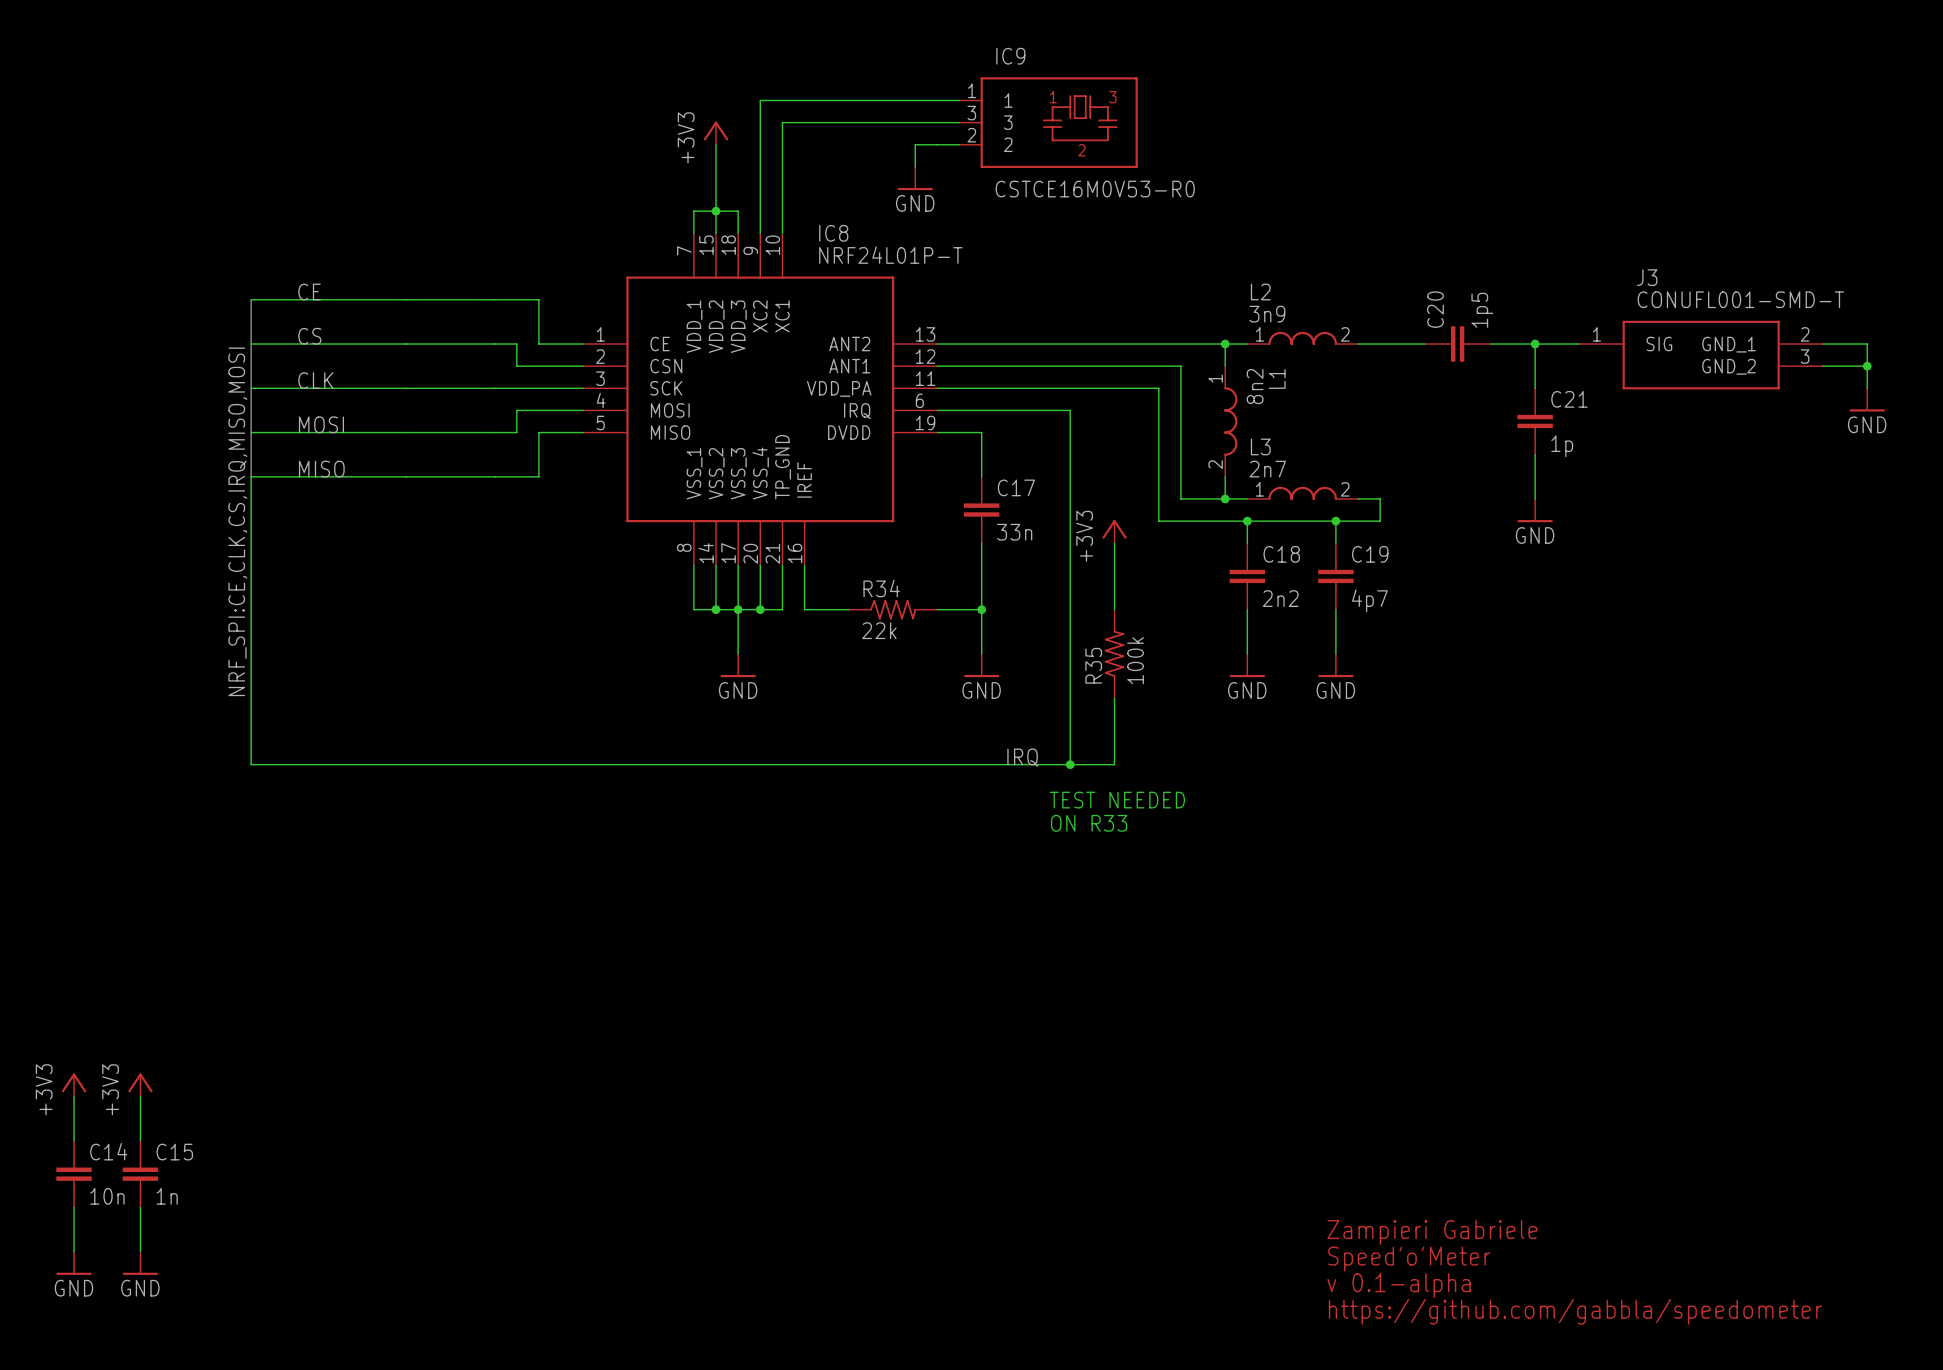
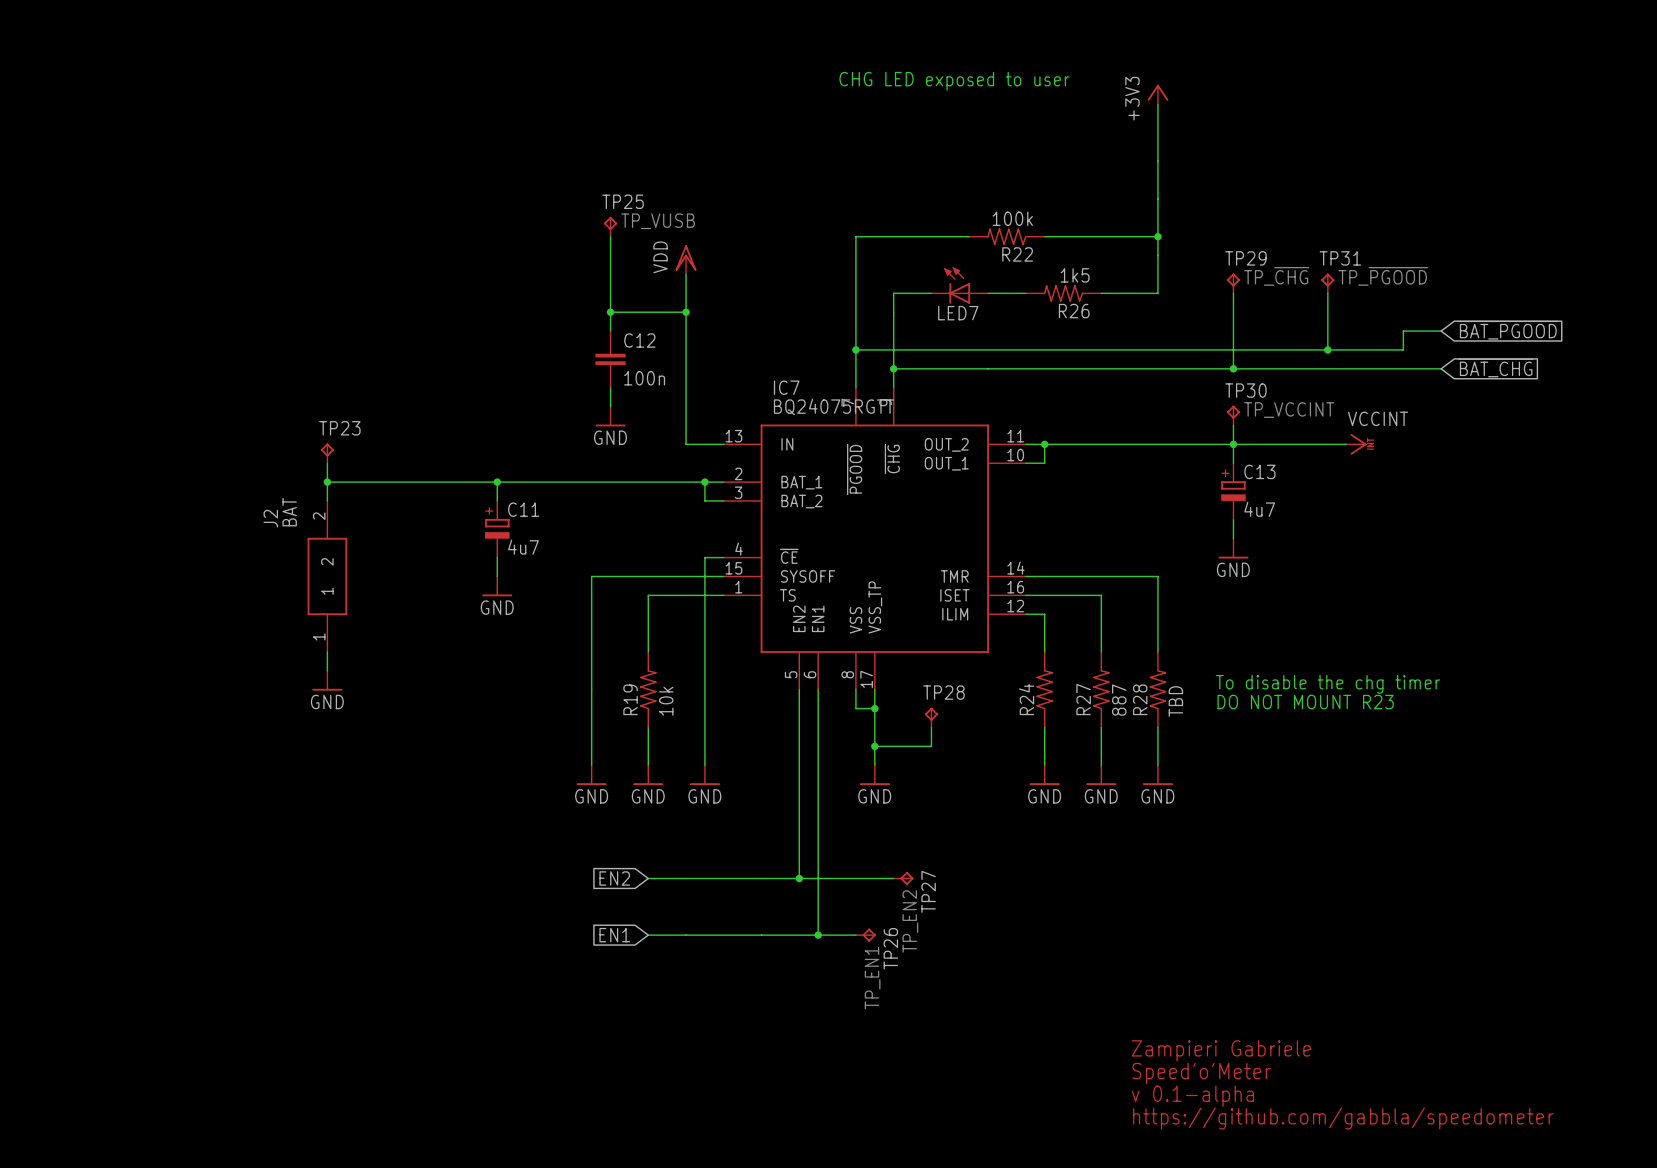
text: none -> CHG LED exposed to user (954, 81)
wire: (959, 100) (760, 100) (760, 233) -> none
power symbol: none -> +3V3 (1157, 94)
wire: (959, 122) (782, 122) (782, 233) -> none
IC9: CSTCE16M0V53-R0 (1048, 122) -> none
wire: none -> (1157, 104) (1157, 293) (1101, 293)
power symbol: +3V3 (716, 133) -> none
wire: (716, 144) (716, 233) -> none
wire: (959, 144) (915, 144) (915, 166) -> none
power symbol: GND (915, 178) -> none
junction: (716, 211) -> none
wire: (693, 233) (693, 211) (738, 211) (738, 233) -> none
TP25: none -> (610, 226)
wire: none -> (610, 236) (610, 331)
wire: none -> (969, 236) (855, 236) (855, 387)
R22: none -> 100k (1006, 236)
wire: none -> (1044, 236) (1157, 236)
junction: none -> (1157, 236)
label: CE (309, 291) -> none
bus: (251, 299) (251, 476) -> none
wire: (251, 299) (538, 299) (538, 344) (583, 344) -> none
power symbol: none -> VDD (686, 259)
wire: none -> (686, 274) (686, 444) (723, 444)
TP29: none -> (1233, 283)
TP31: none -> (1327, 283)
LED7: none -> (959, 285)
label: CS (309, 336) -> none
L2: 3n9 (1302, 338) -> none
wire: (251, 344) (516, 344) (516, 366) (583, 366) -> none
wire: (937, 344) (1048, 344) -> (893, 387) (893, 293)
wire: (1225, 344) (1225, 366) -> none
junction: (1225, 344) -> none
R26: none -> 1k5 (1063, 293)
wire: (1358, 344) (1424, 344) -> none
wire: none -> (1233, 293) (1233, 368)
C20: 1p5 (1457, 344) -> none
wire: (1490, 344) (1579, 344) -> none
wire: (1535, 344) (1535, 388) -> none
junction: (1535, 344) -> none
wire: none -> (1327, 293) (1327, 349)
wire: (1822, 344) (1867, 344) (1867, 388) -> none
J3: CONUFL001-SMD-T (1701, 355) -> none
wire: none -> (610, 312) (686, 312)
junction: none -> (610, 312)
junction: none -> (686, 312)
wire: (937, 366) (1180, 366) (1180, 498) (1247, 498) -> none
wire: (1822, 366) (1867, 366) -> none
junction: (1867, 366) -> none
label: CLK (315, 380) -> none
global label: none -> ~{BAT_PGOOD} (1508, 330)
wire: (251, 388) (583, 388) -> none
wire: (937, 388) (1158, 388) (1158, 521) (1203, 521) -> none
IC8: NRF24L01P-T (760, 399) -> none
power symbol: GND (1867, 399) -> none
wire: (583, 410) (516, 410) (516, 432) (251, 432) -> none
wire: (937, 410) (1003, 410) -> none
junction: none -> (855, 349)
wire: (1070, 410) (1070, 764) -> (912, 349) (1403, 349) (1403, 331) (1441, 331)
junction: none -> (1327, 349)
C12: none -> 100n (610, 359)
L1: 8n2 (1230, 421) -> none
C21: 1p (1535, 421) -> none
label: MOSI (321, 424) -> none
global label: none -> ~{BAT_CHG} (1495, 367)
wire: (583, 432) (538, 432) (538, 476) (251, 476) (251, 764) (1114, 764) (1114, 698) -> none
wire: (937, 432) (981, 432) (981, 476) -> none
wire: none -> (893, 368) (1441, 368)
junction: none -> (893, 368)
junction: none -> (1233, 368)
wire: none -> (610, 387) (610, 406)
wire: (1535, 454) (1535, 498) -> (1233, 425) (1233, 463)
label: MISO (321, 469) -> none
wire: (1225, 476) (1225, 498) -> none
TP30: none -> (1233, 415)
power symbol: none -> GND (610, 416)
L3: 2n7 (1302, 493) -> none
junction: (1225, 498) -> none
wire: (1358, 498) (1380, 498) (1380, 521) -> (1346, 444) (1176, 444)
C17: 33n (981, 510) -> none
power symbol: GND (1535, 510) -> none
label: NRF_SPI:CE,CLK,CS,IRQ,MISO,MOSI (237, 521) -> none
wire: none -> (1044, 444) (1044, 463) (1025, 463)
junction: none -> (1044, 444)
wire: (1247, 521) (1247, 543) -> none
junction: (1247, 521) -> none
wire: (1335, 521) (1335, 543) -> (1233, 519) (1233, 538)
junction: (1335, 521) -> none
junction: none -> (1233, 444)
power symbol: none -> VCCINT (1356, 444)
TP23: none -> (327, 453)
power symbol: +3V3 (1114, 531) -> none
wire: none -> (327, 463) (327, 500)
wire: (981, 543) (981, 653) -> none
wire: (1114, 543) (1114, 609) -> none
wire: none -> (327, 482) (723, 482)
junction: none -> (327, 482)
wire: none -> (497, 482) (497, 500)
junction: none -> (497, 482)
wire: (693, 565) (693, 609) (782, 609) (782, 565) -> none
wire: (716, 565) (716, 609) -> none
wire: (738, 565) (738, 653) -> none
wire: (760, 565) (760, 609) -> none
wire: (804, 565) (804, 609) (848, 609) -> none
wire: none -> (704, 482) (704, 500) (723, 500)
junction: none -> (704, 482)
C18: 2n2 (1247, 576) -> none
C19: 4p7 (1335, 576) -> none
C13: none -> 4u7 (1233, 491)
junction: (716, 609) -> none
junction: (738, 609) -> none
junction: (760, 609) -> none
R34: 22k (893, 609) -> none
wire: (937, 609) (981, 609) -> none
junction: (981, 609) -> none
wire: (1247, 609) (1247, 653) -> none
wire: (1335, 609) (1335, 653) -> none
C11: none -> 4u7 (497, 529)
IC7: none -> BQ24075RGTT (874, 538)
power symbol: none -> GND (1233, 548)
wire: none -> (497, 557) (497, 576)
wire: none -> (723, 557) (704, 557) (704, 765)
R35: 100k (1114, 653) -> none
power symbol: GND (738, 665) -> none
power symbol: GND (981, 665) -> none
power symbol: GND (1247, 665) -> none
power symbol: GND (1335, 665) -> none
J2: none -> BAT (327, 576)
wire: none -> (723, 576) (591, 576) (591, 765)
wire: none -> (1025, 576) (1157, 576) (1157, 651)
power symbol: none -> GND (497, 586)
wire: none -> (723, 595) (648, 595) (648, 651)
wire: none -> (1025, 595) (1101, 595) (1101, 651)
wire: none -> (1025, 614) (1044, 614) (1044, 651)
label: IRQ (1022, 757) -> none
wire: none -> (327, 651) (327, 670)
junction: (1070, 764) -> none
power symbol: none -> GND (327, 680)
text: TEST NEEDED (1117, 800) -> none
text: none -> To disable the chg timer (1327, 684)
R19: none -> 10k (648, 689)
wire: none -> (799, 689) (799, 878)
wire: none -> (818, 689) (818, 935)
wire: none -> (855, 689) (855, 708) (874, 708)
wire: none -> (874, 689) (874, 765)
R24: none -> (1044, 689)
R27: none -> 887 (1101, 689)
R28: none -> TBD (1157, 689)
text: ON R33 (1089, 823) -> none
text: none -> DO NOT MOUNT R23 (1305, 702)
junction: none -> (874, 708)
TP28: none -> (931, 717)
wire: none -> (648, 727) (648, 765)
wire: none -> (931, 727) (931, 746) (874, 746)
wire: none -> (1044, 727) (1044, 765)
wire: none -> (1101, 727) (1101, 765)
wire: none -> (1157, 727) (1157, 765)
junction: none -> (874, 746)
power symbol: none -> GND (591, 775)
power symbol: none -> GND (648, 775)
power symbol: none -> GND (704, 775)
power symbol: none -> GND (874, 775)
power symbol: none -> GND (1044, 775)
power symbol: none -> GND (1101, 775)
power symbol: none -> GND (1157, 775)
global label: none -> EN2 (614, 878)
wire: none -> (648, 878) (893, 878)
junction: none -> (799, 878)
TP27: none -> (903, 878)
power symbol: +3V3 (74, 1085) -> none
power symbol: +3V3 (140, 1085) -> none
wire: (74, 1096) (74, 1140) -> none
wire: (140, 1096) (140, 1140) -> none
global label: none -> EN1 (614, 935)
wire: none -> (648, 935) (855, 935)
junction: none -> (818, 935)
TP26: none -> (865, 935)
C14: 10n (74, 1174) -> none
C15: 1n (140, 1174) -> none
wire: (74, 1207) (74, 1251) -> none
wire: (140, 1207) (140, 1251) -> none
power symbol: GND (74, 1263) -> none
power symbol: GND (140, 1263) -> none

